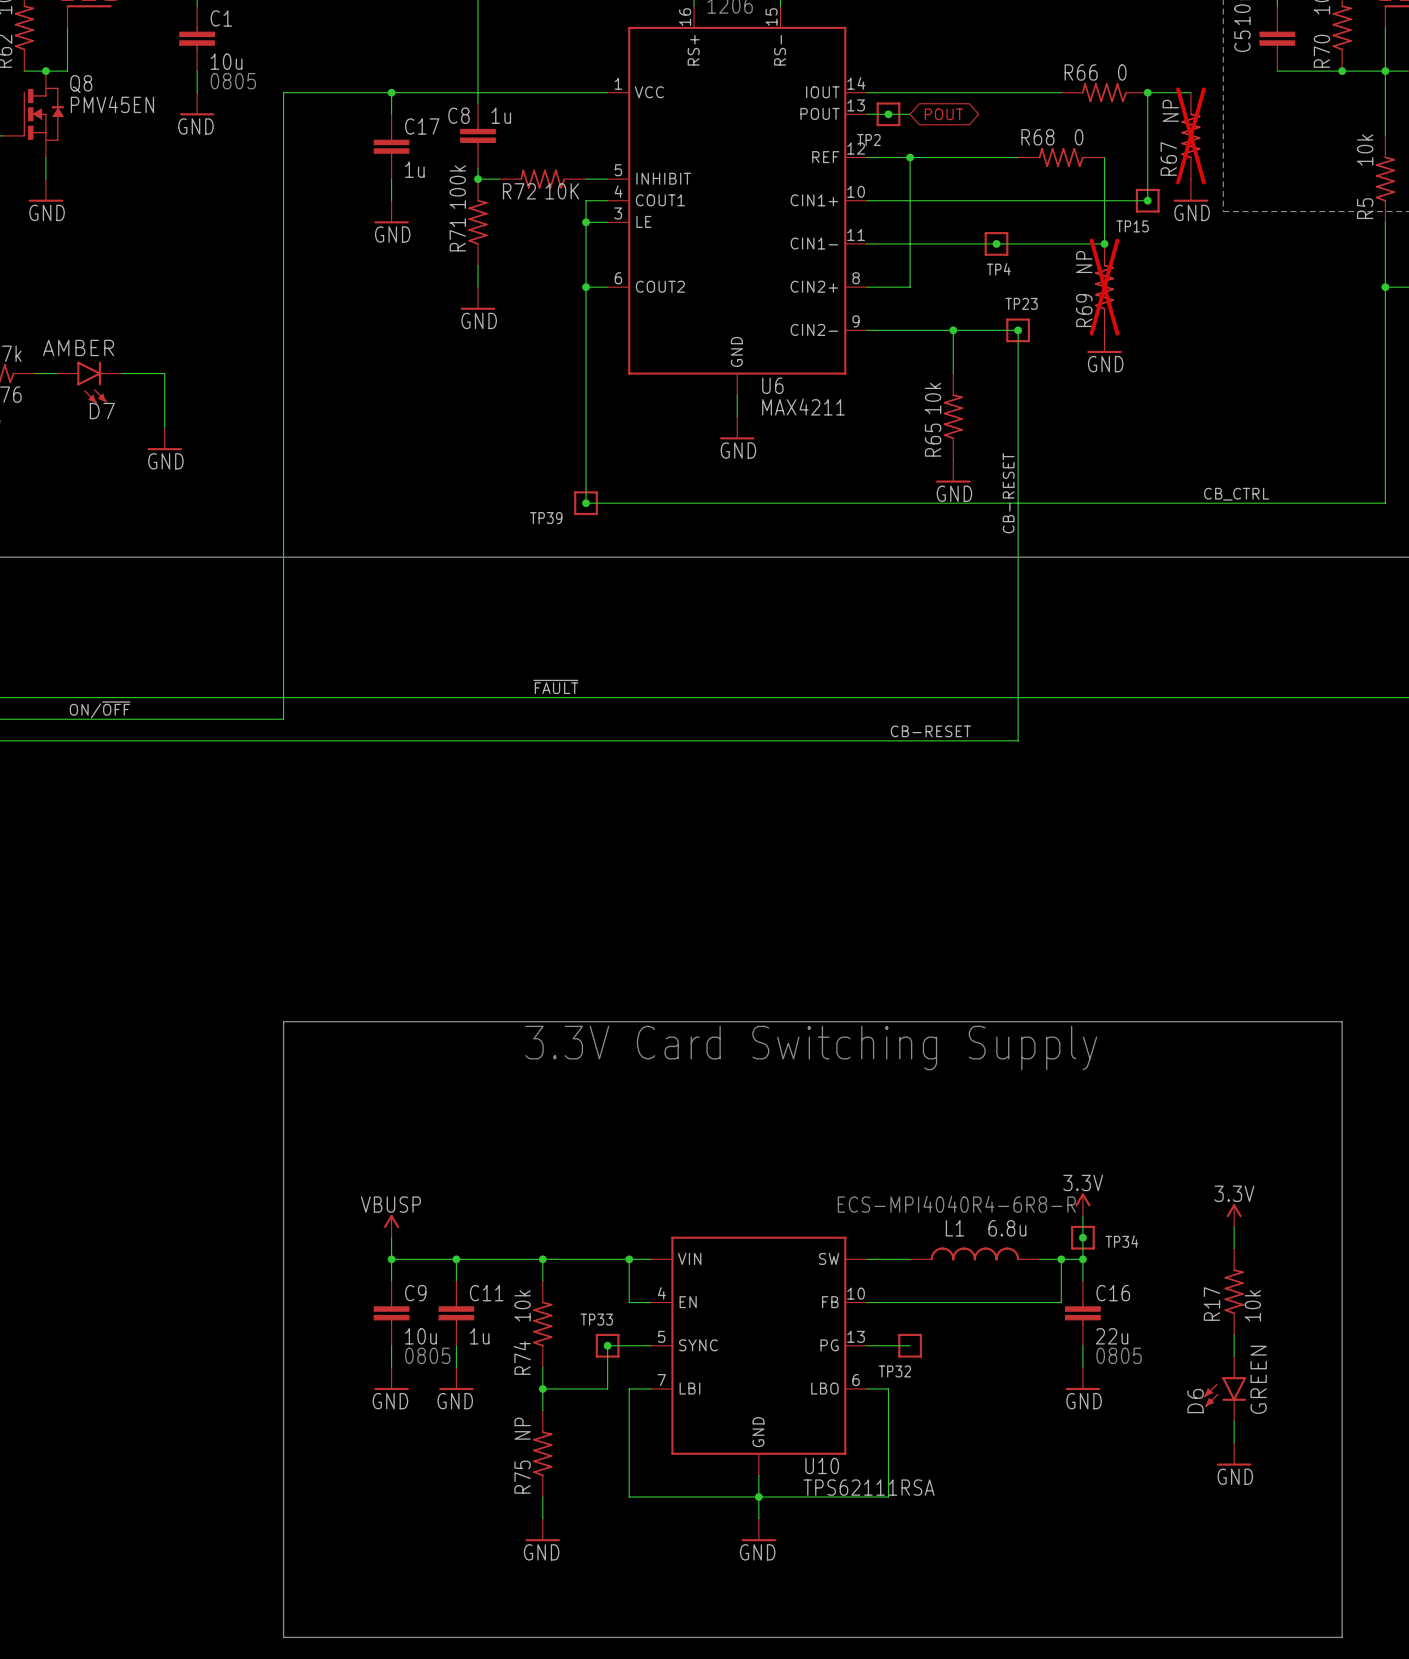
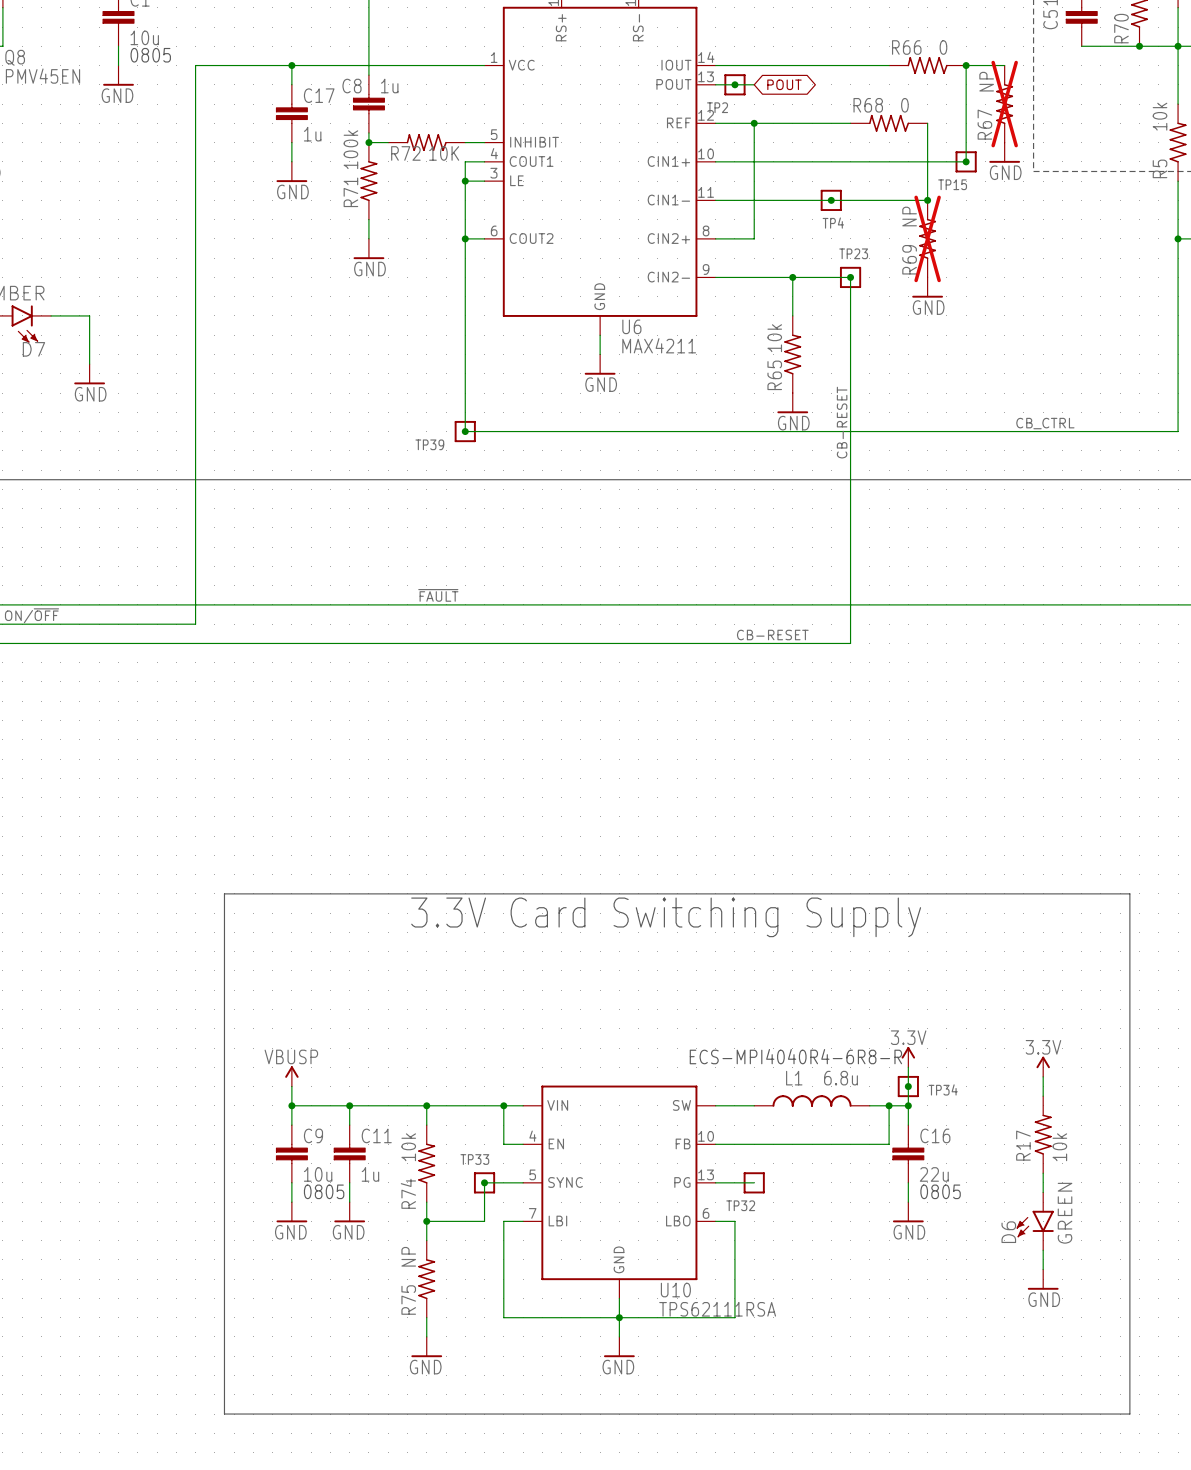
line: (315, 1021) (283, 1021) (283, 1637) (1342, 1637) (1342, 1021) (1331, 1021) -> (224, 893) (224, 1414) (1129, 1414) (1129, 893)

